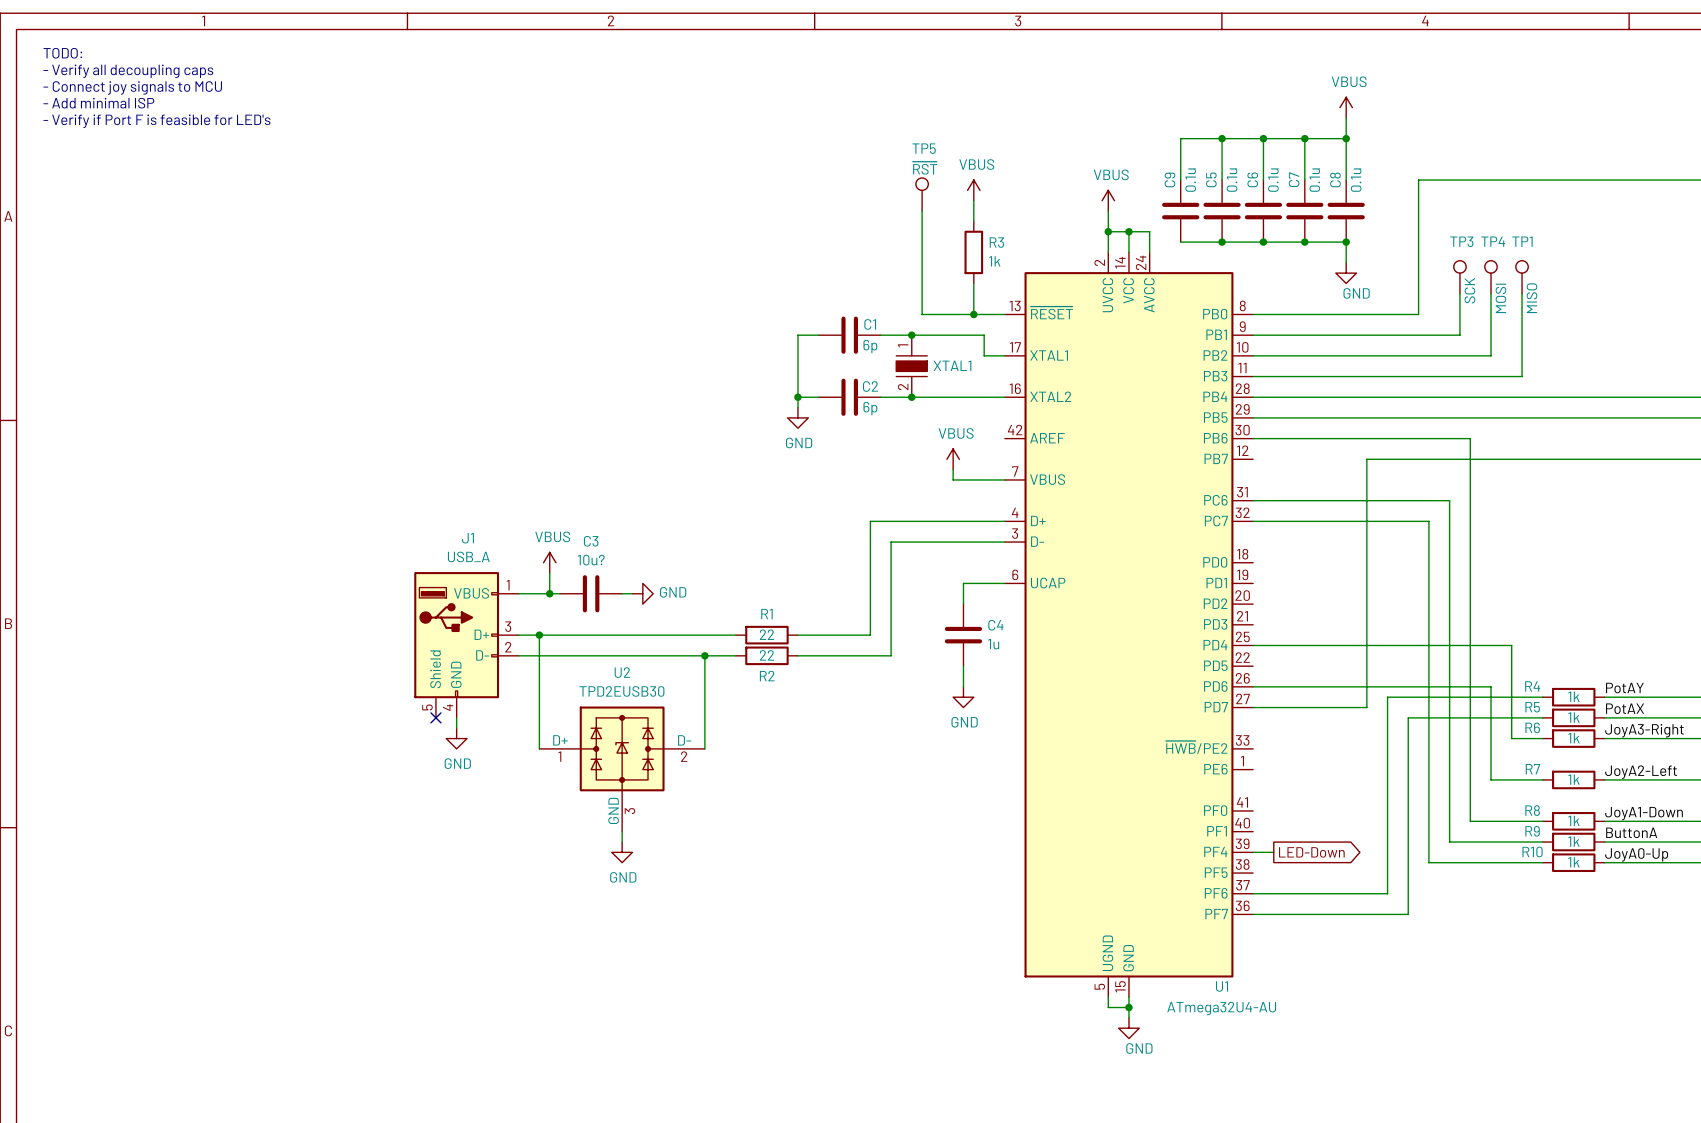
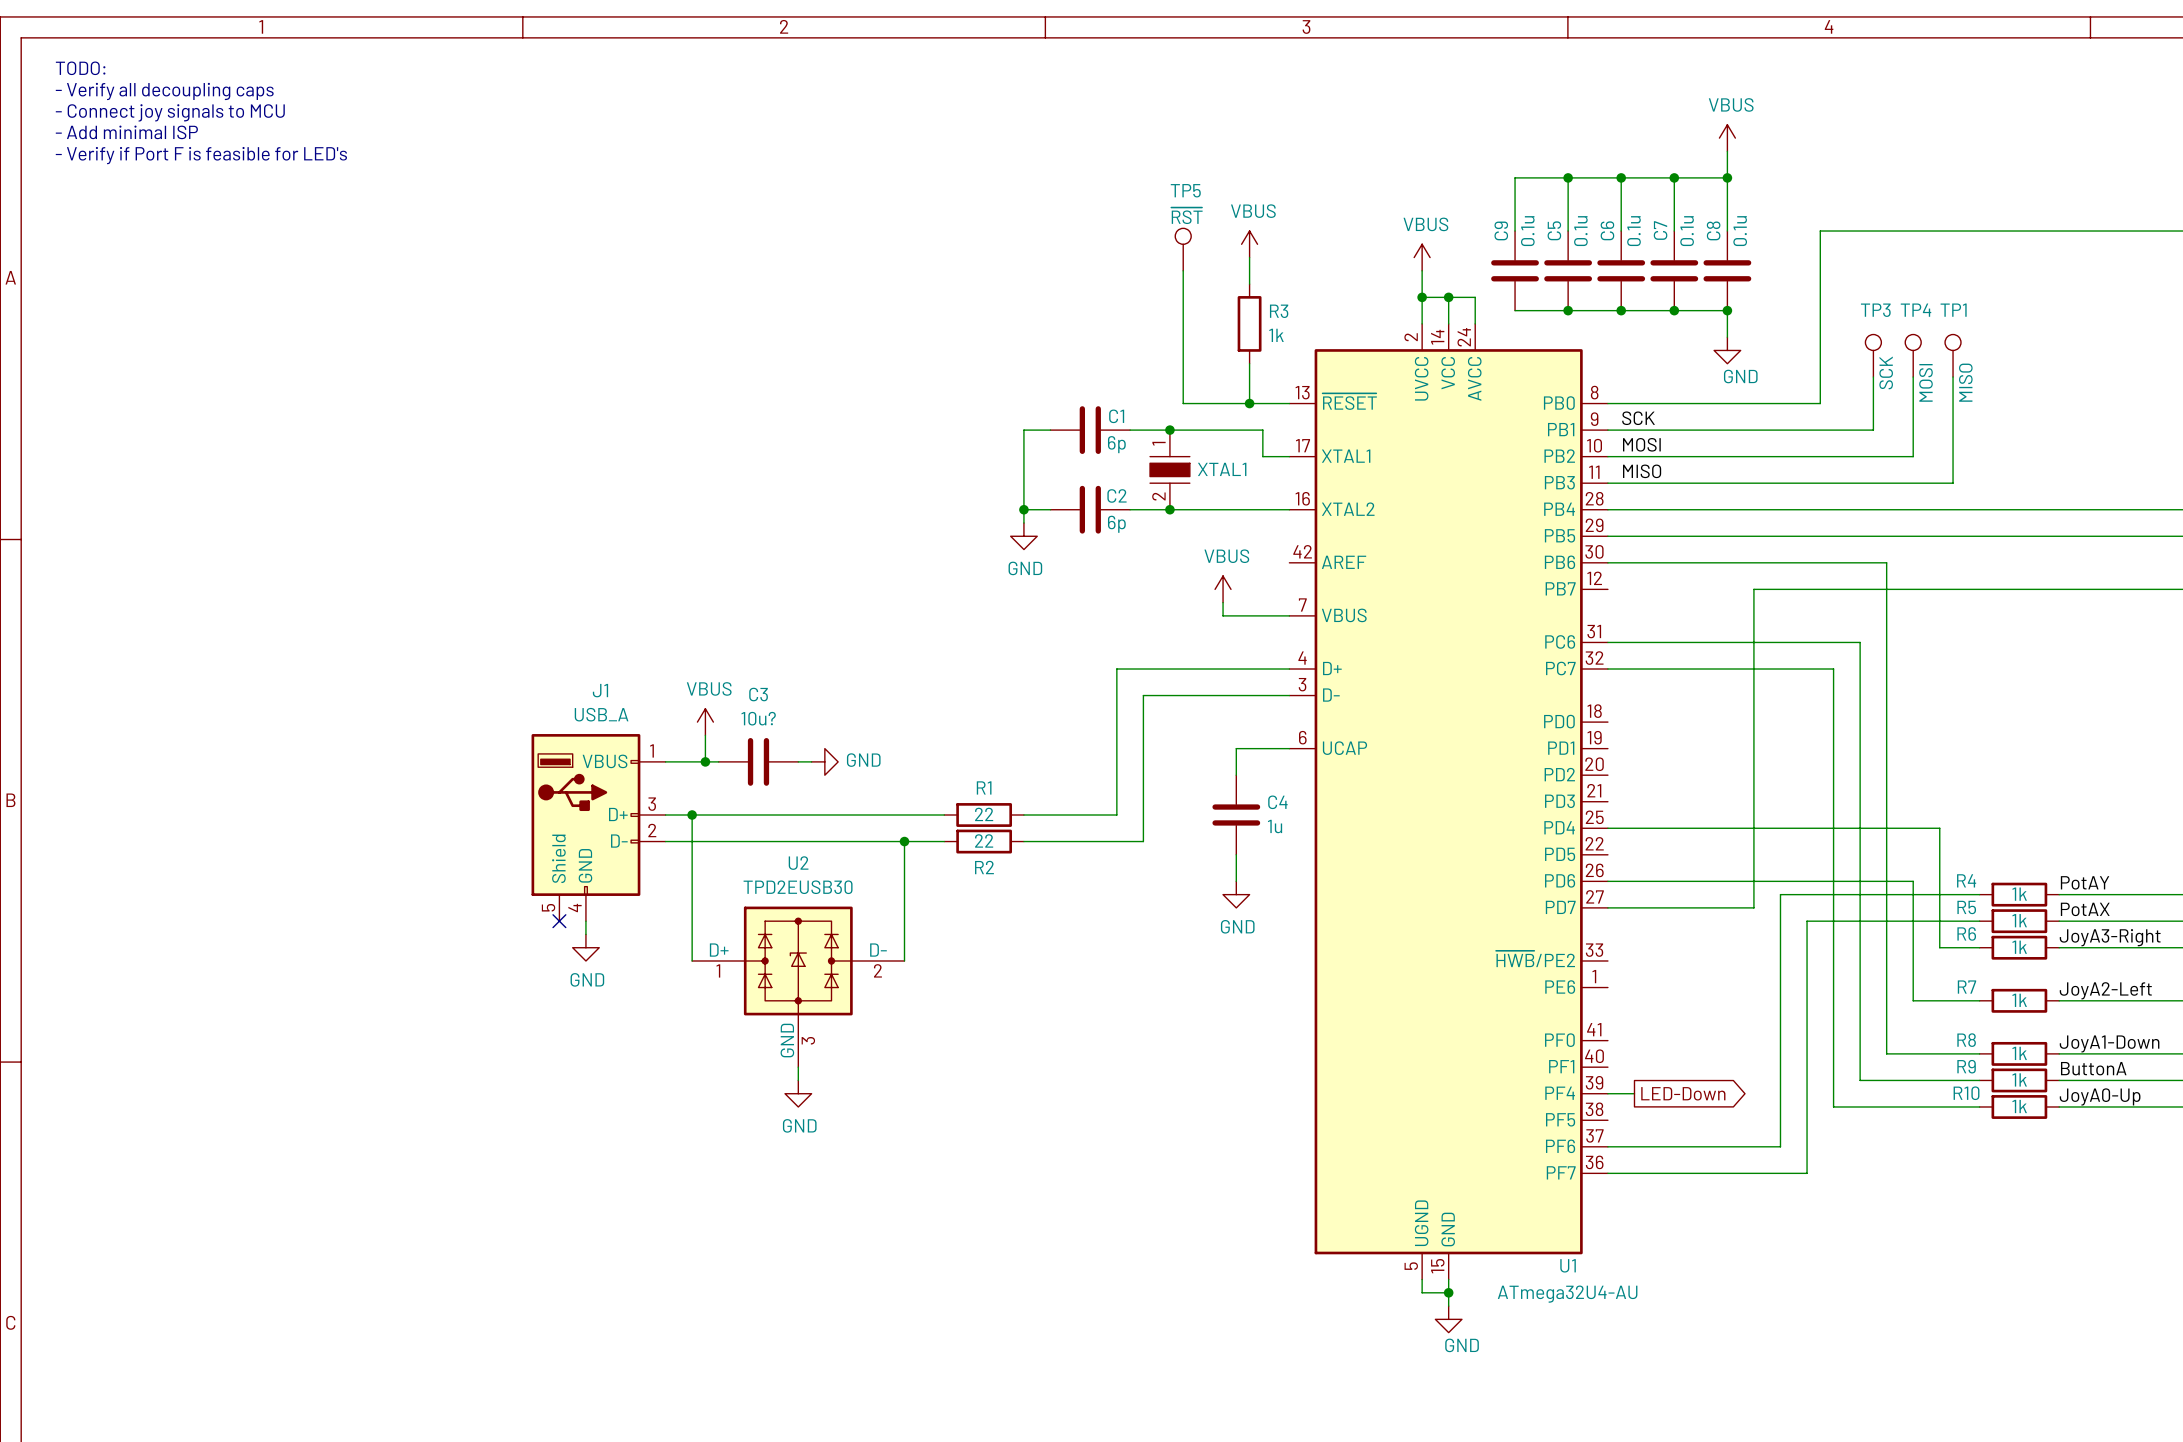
label: none -> SCK (1638, 418)
label: none -> MOSI (1641, 444)
label: none -> MISO (1642, 471)

